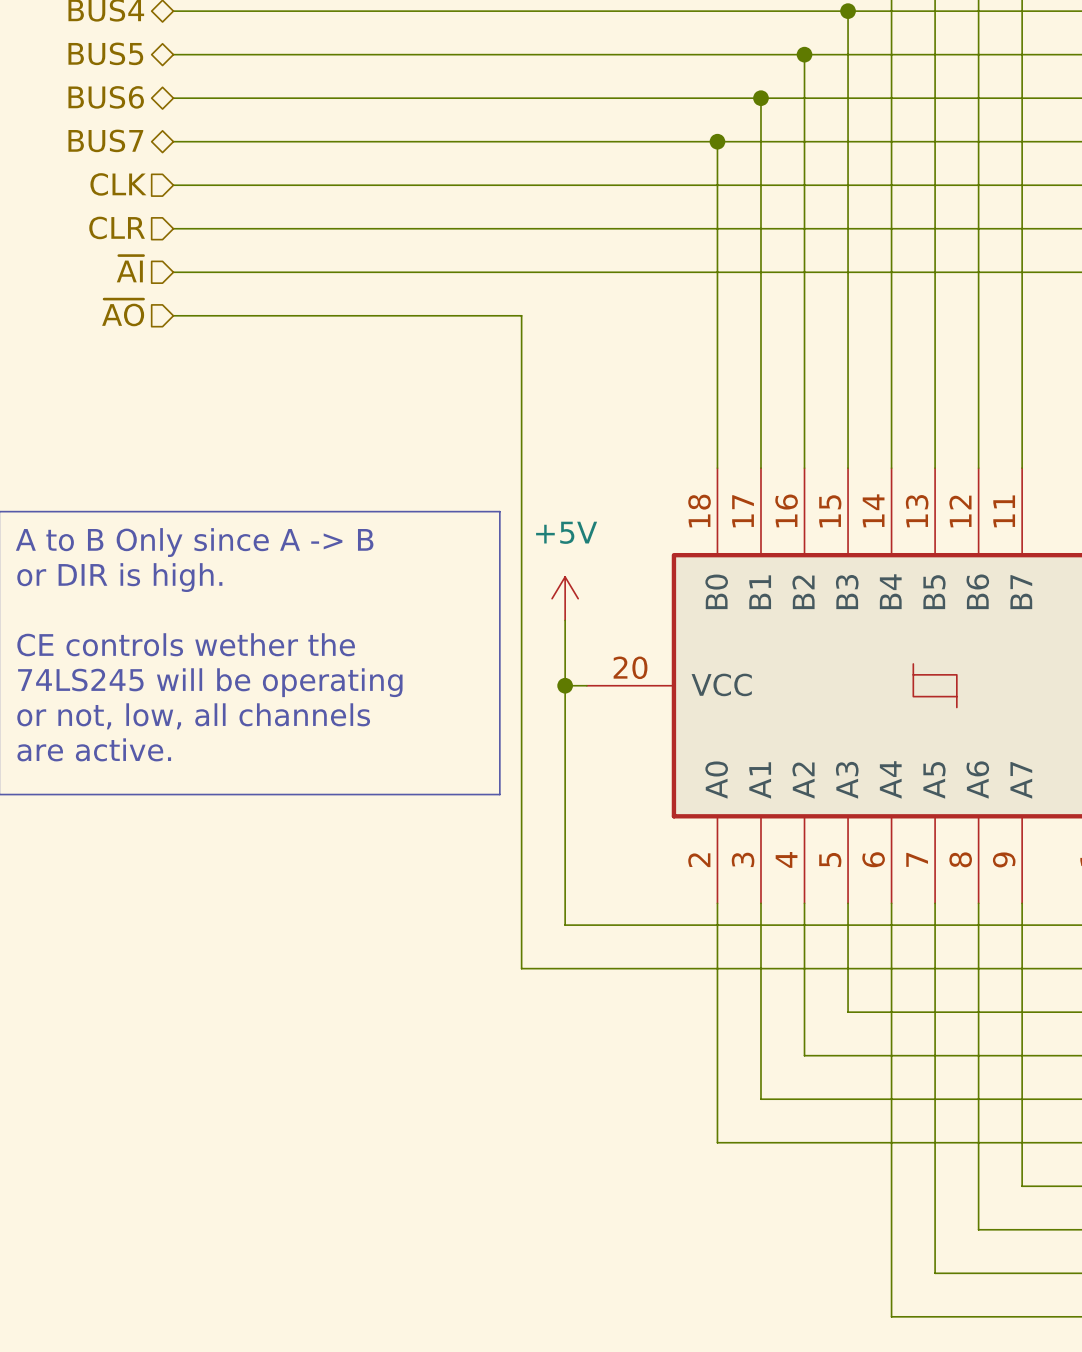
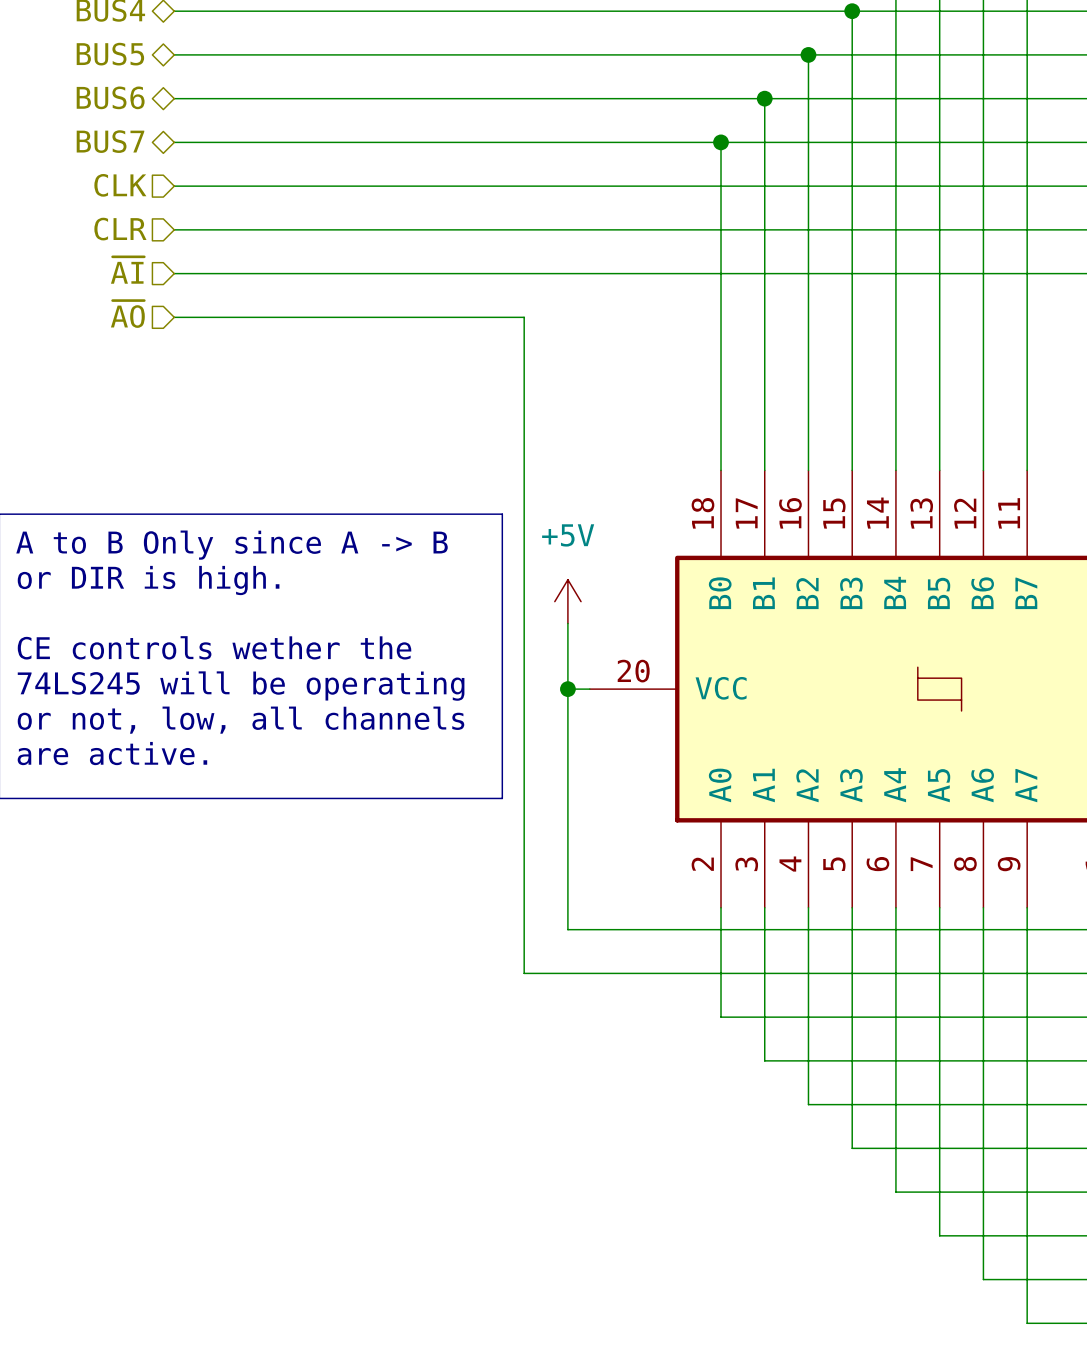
wire: (717, 1012) (717, 1142) (848, 1142) -> (721, 1017) (852, 1017) (852, 1148)
wire: (760, 1055) (760, 1099) (804, 1099) -> (764, 1060) (808, 1060) (808, 1104)
wire: (891, 1186) (891, 1316) (1022, 1316) -> (895, 1192) (1027, 1192) (1027, 1323)
wire: (935, 1229) (935, 1273) (978, 1273) -> (939, 1235) (983, 1235) (983, 1279)

